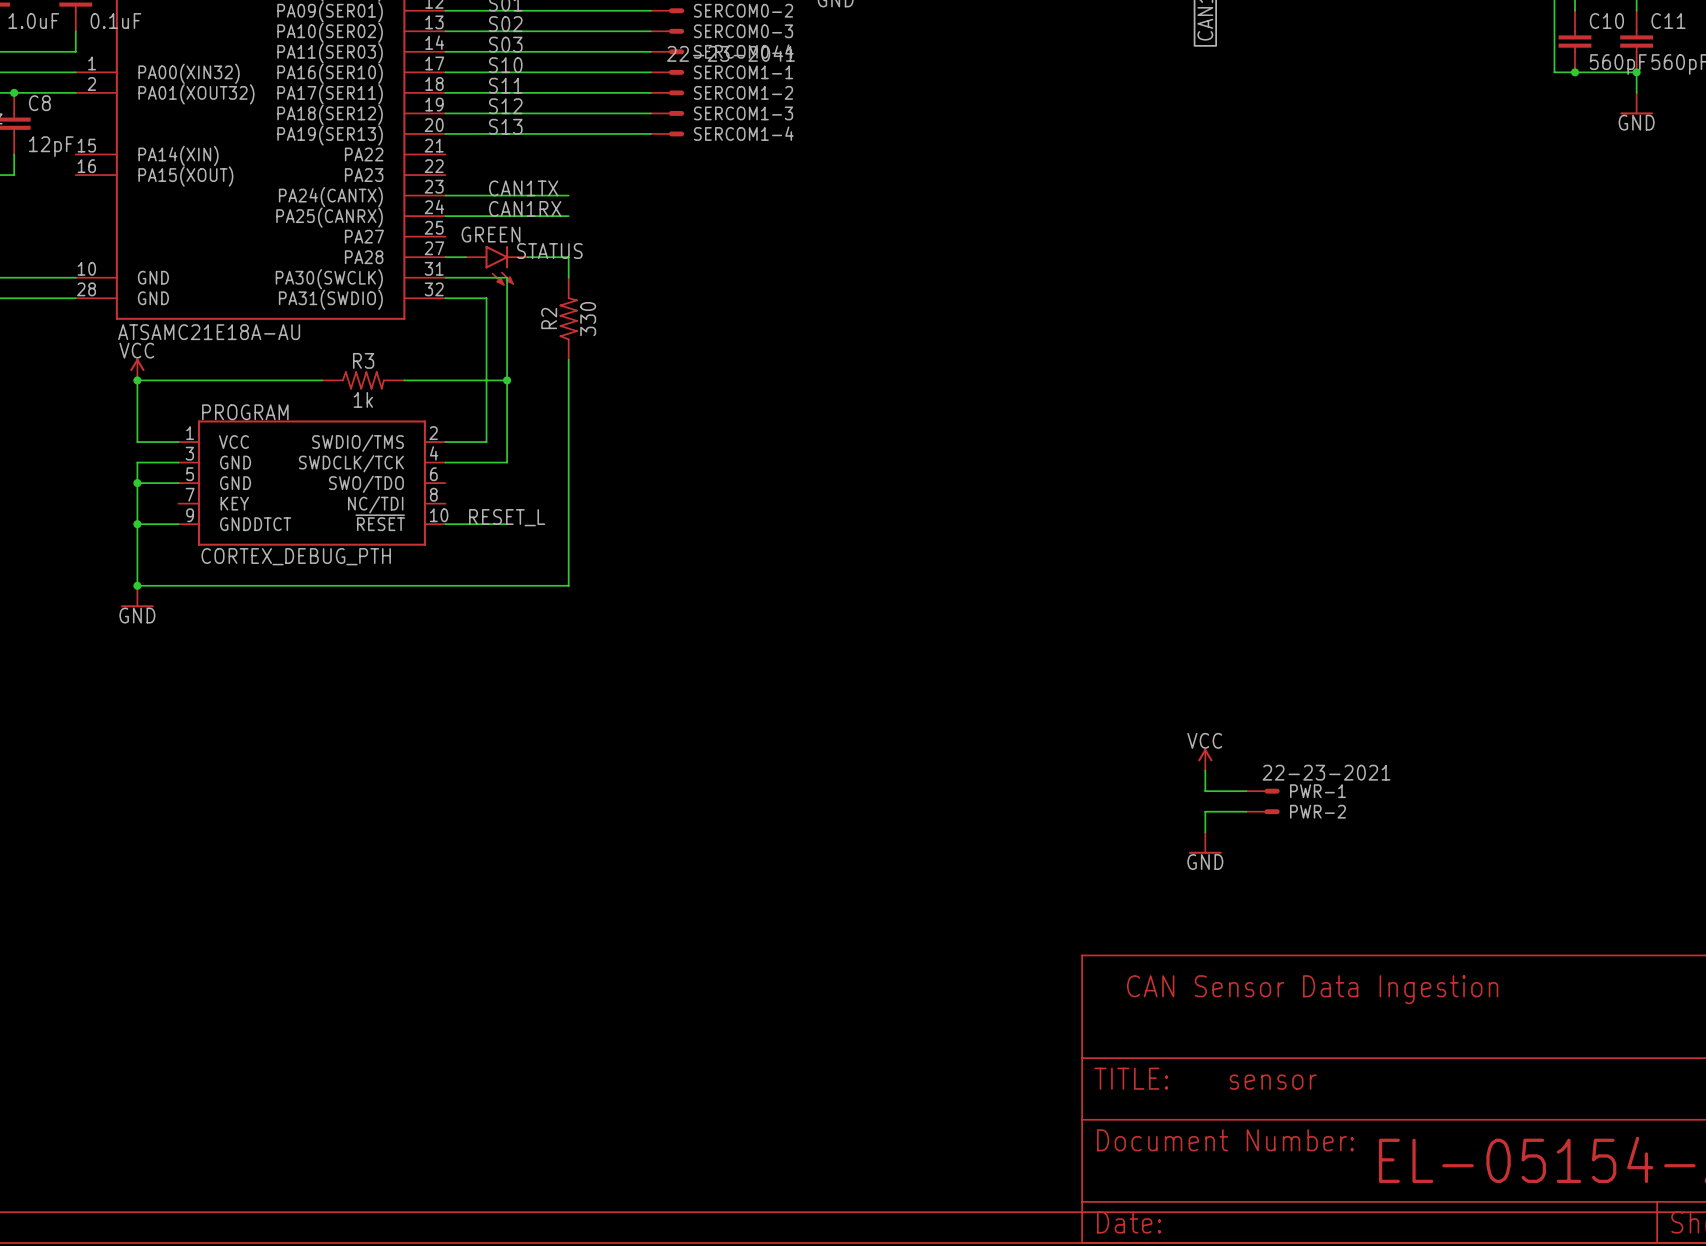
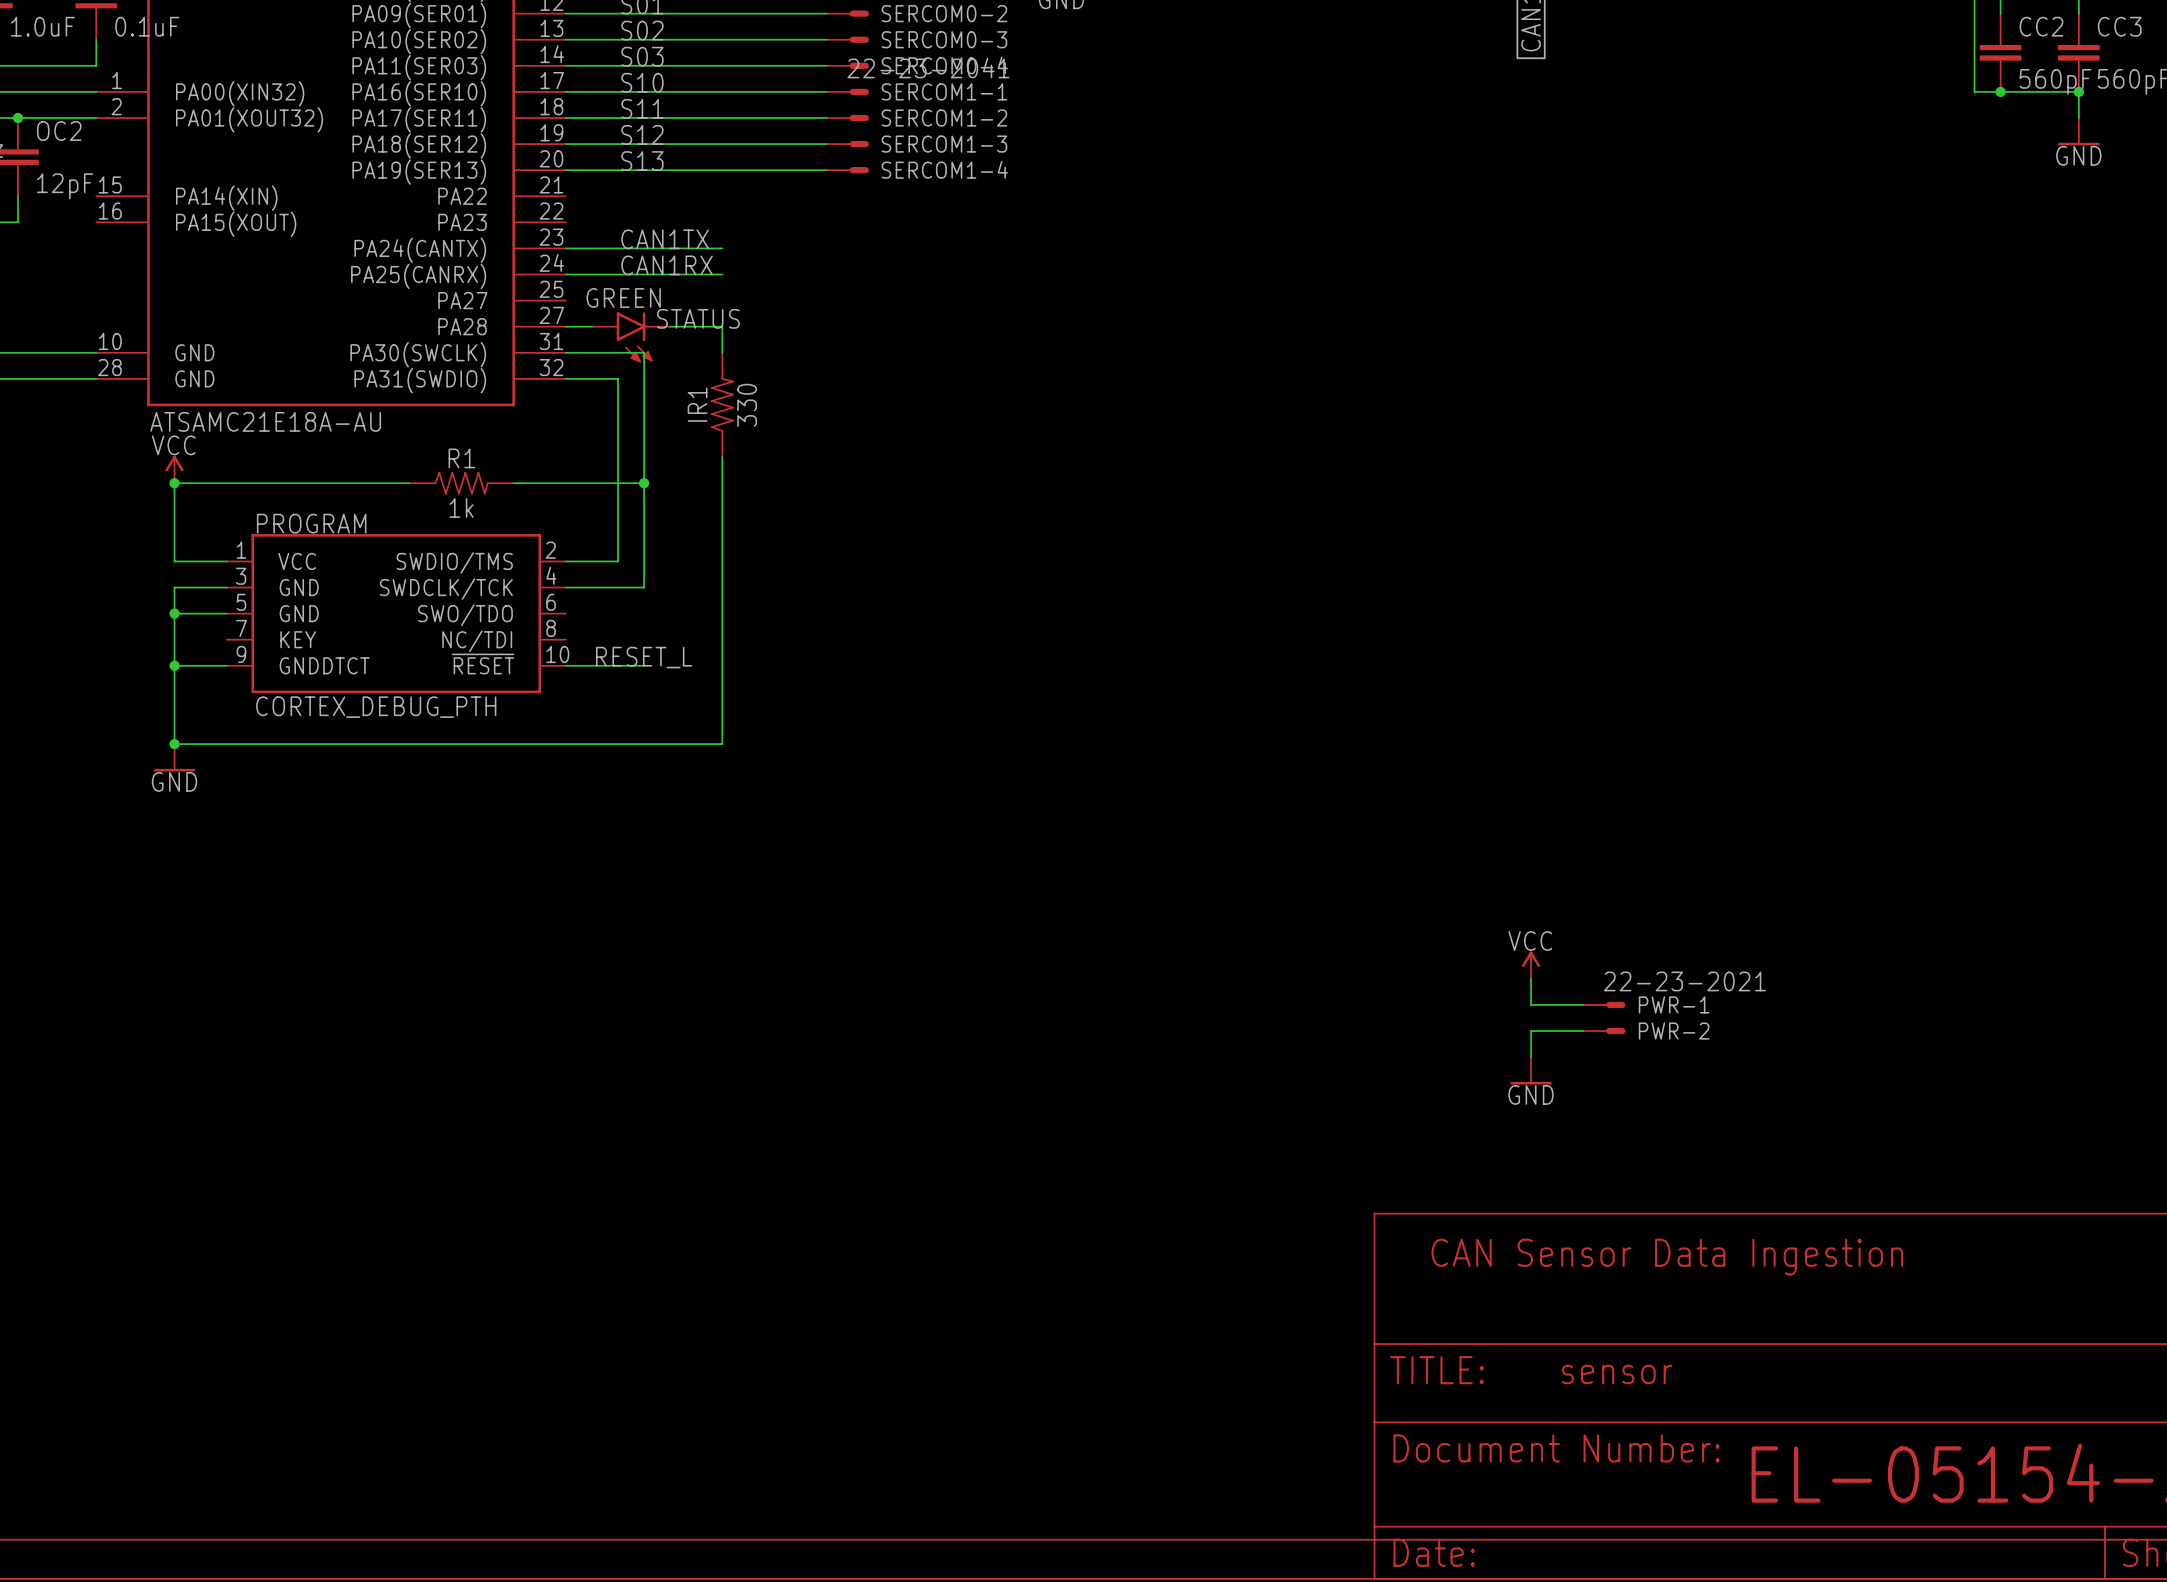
C10 name: C10 (1606, 21) -> CC2 (2041, 26)
C11 name: C11 (1668, 21) -> CC3 (2119, 26)
C8 name: C8 (39, 103) -> OC2 (59, 131)
R2 name: R2 (549, 318) -> IR1 (697, 404)
R3 name: R3 (363, 360) -> R1 (461, 458)

